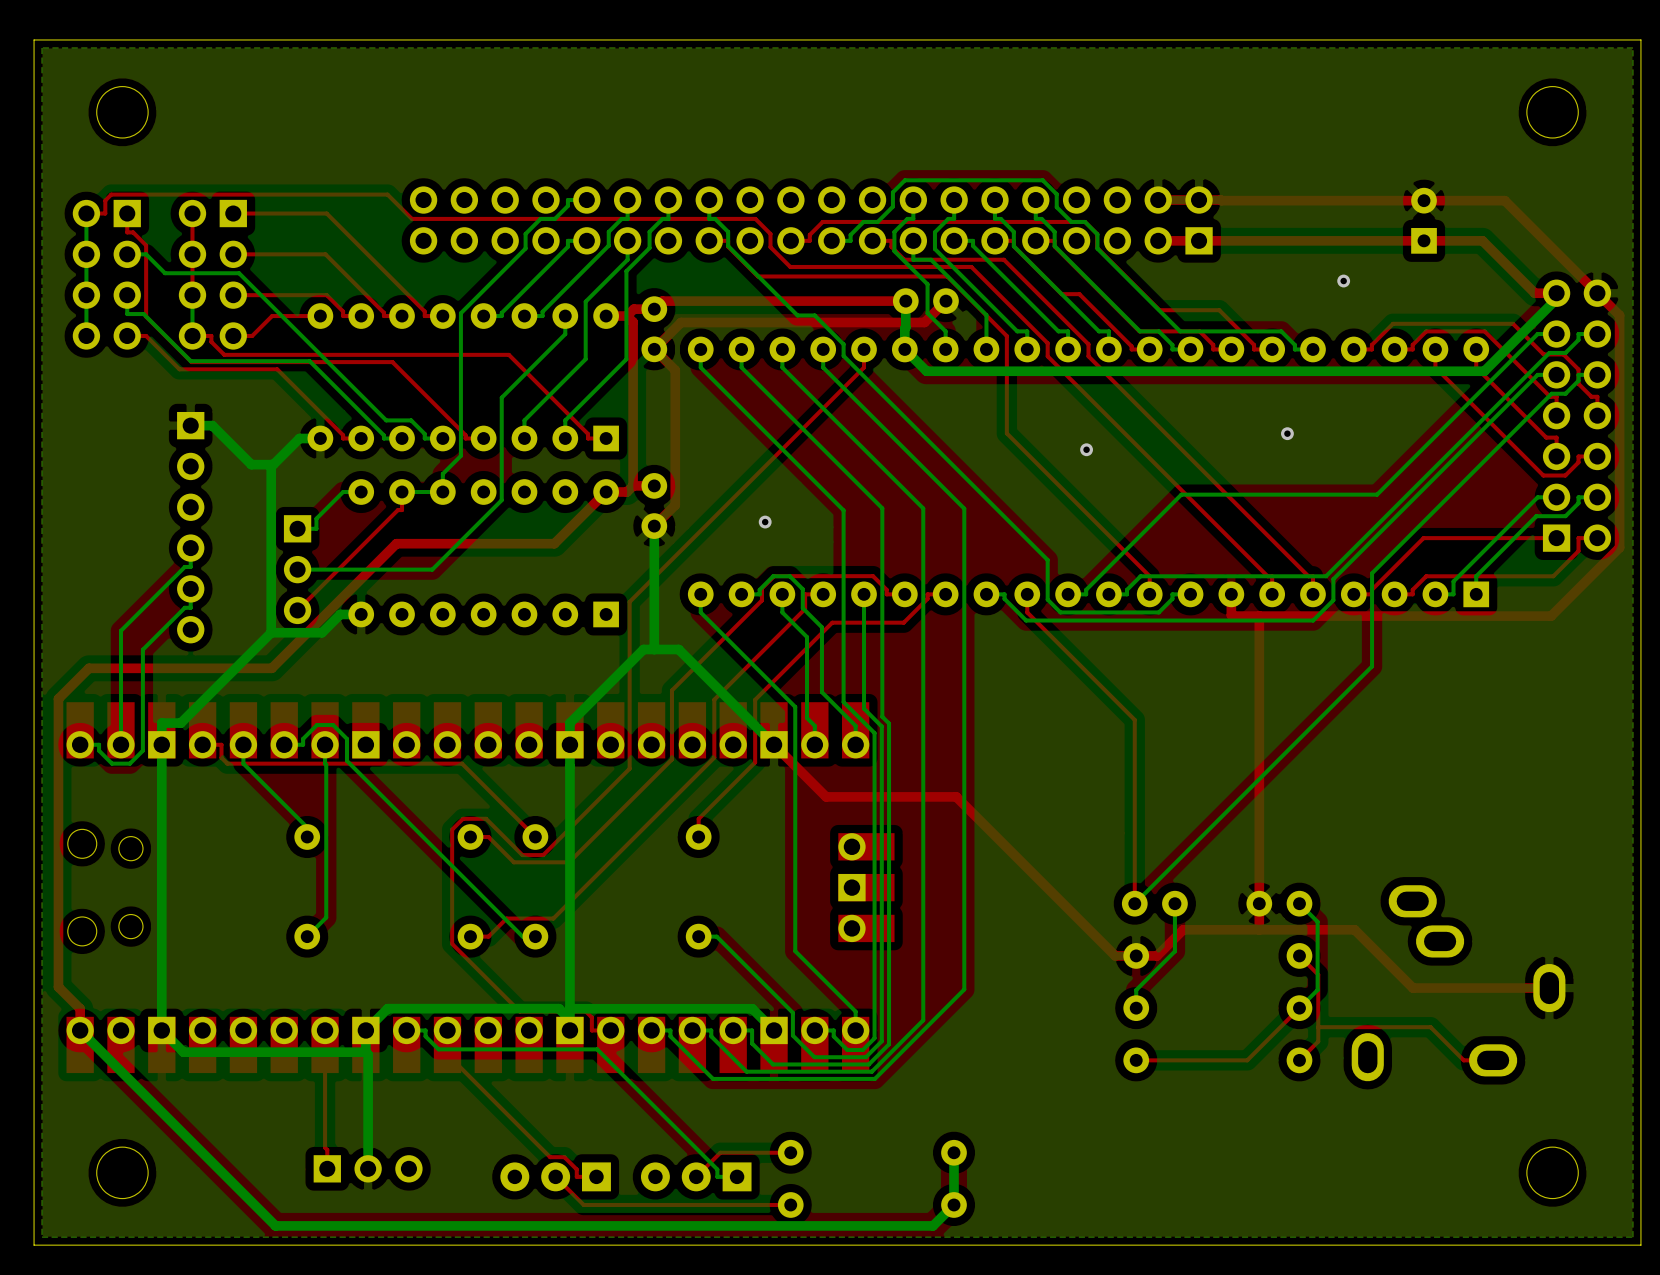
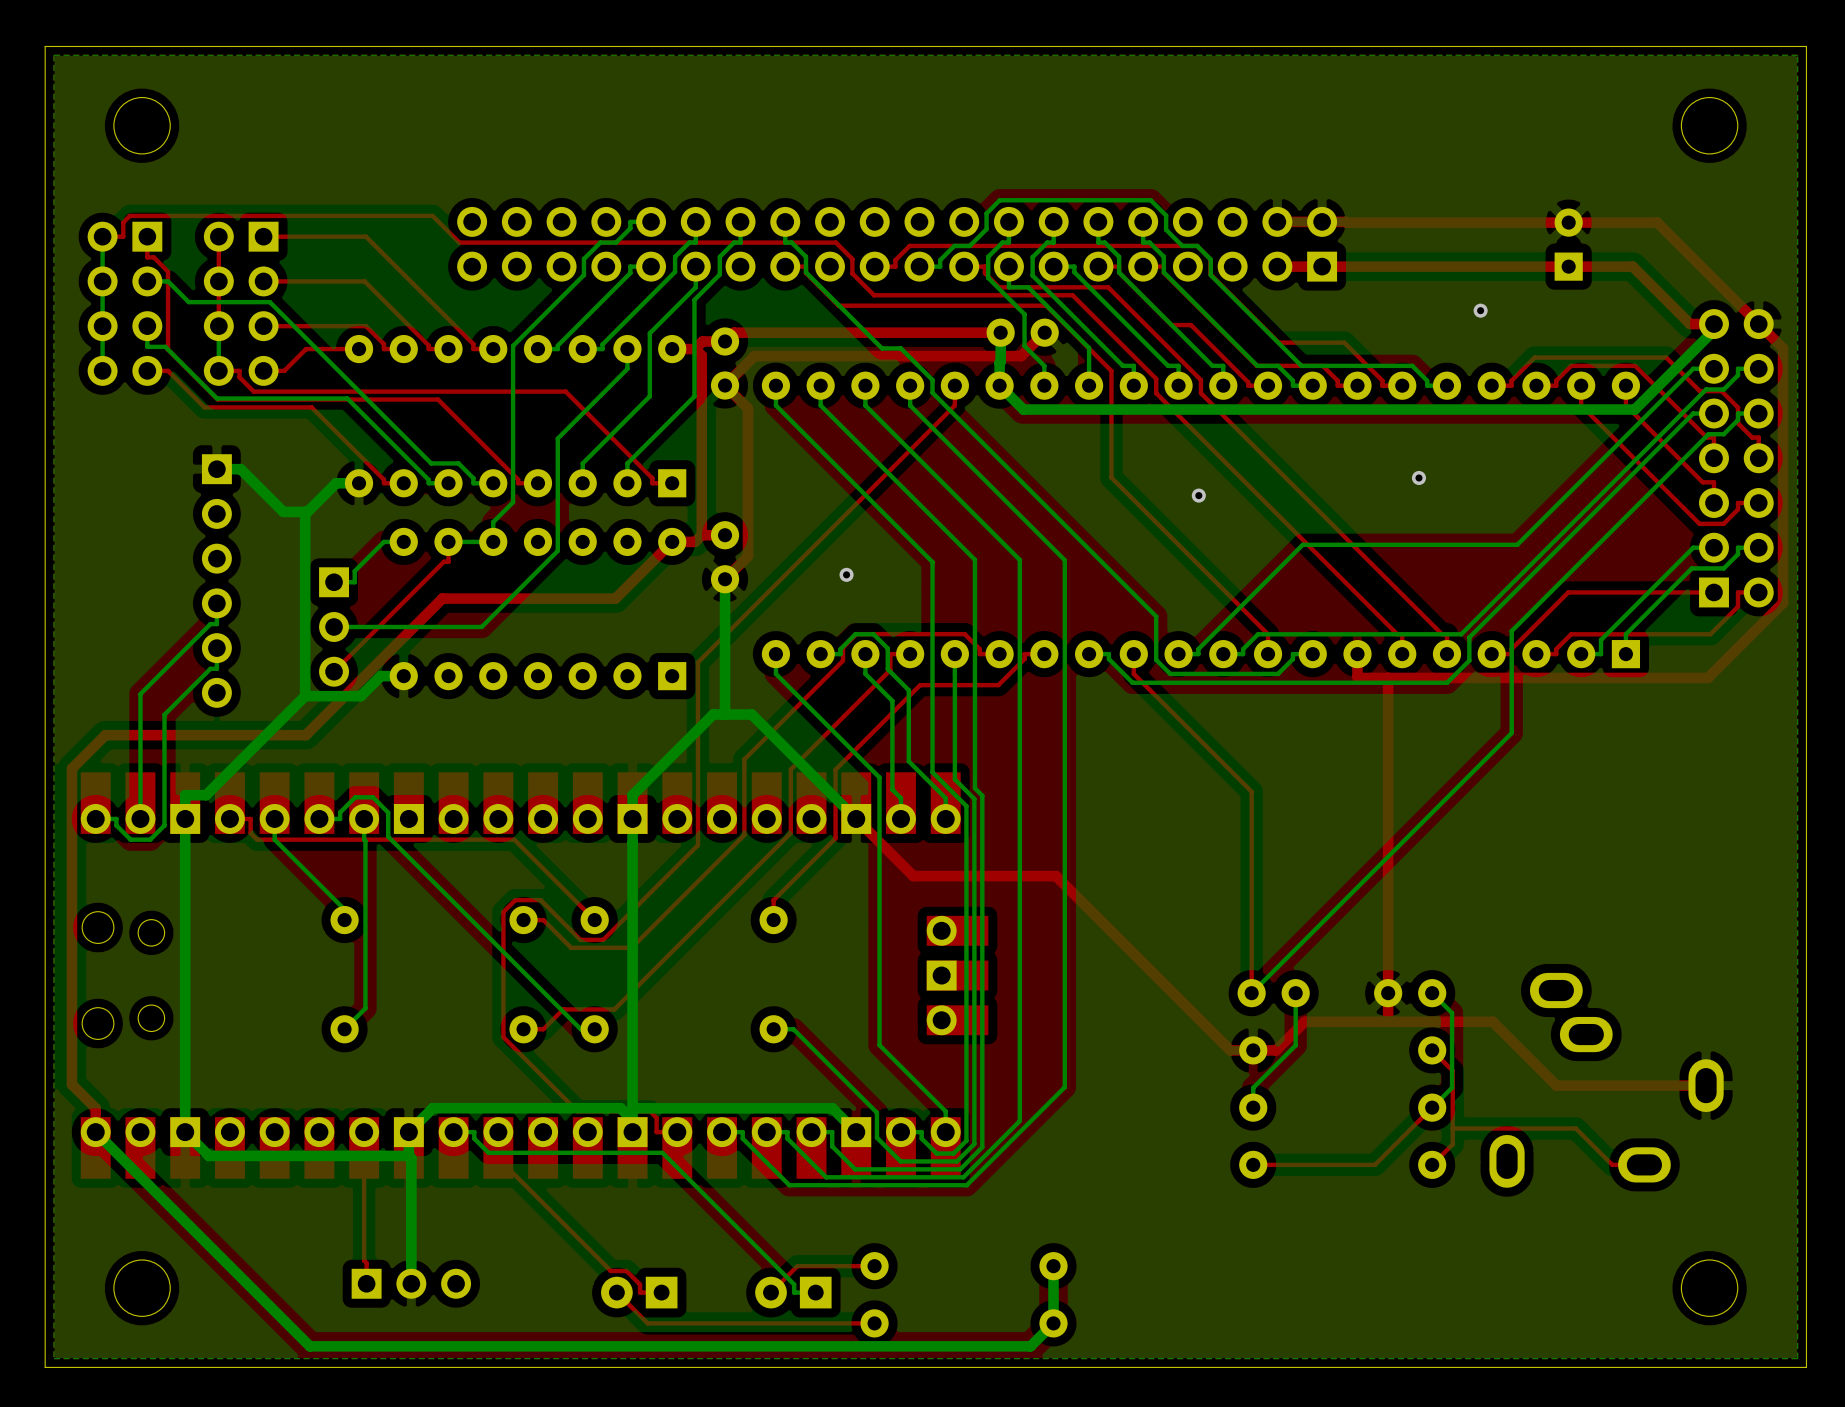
part: (555, 1176) -> none
part: (696, 1176) -> none

